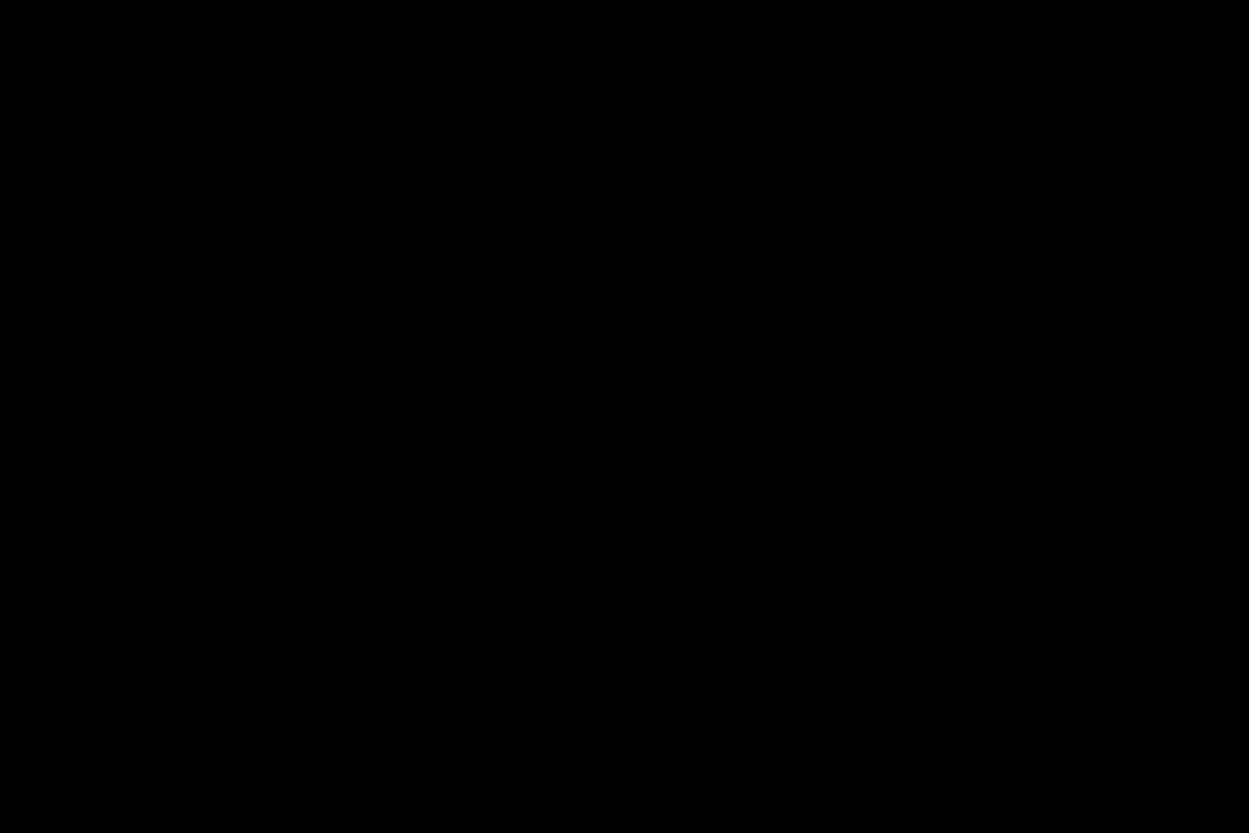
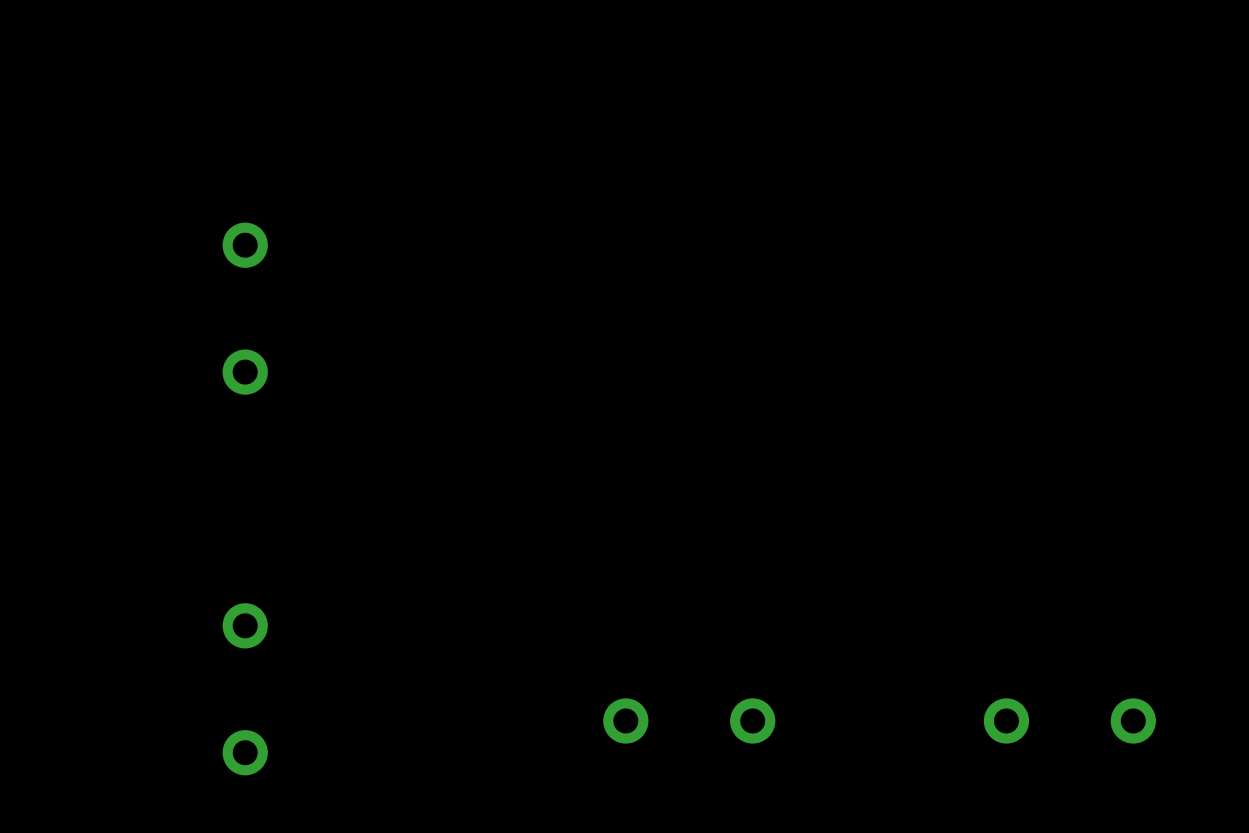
via: none -> (245, 245)
via: none -> (245, 372)
via: none -> (245, 625)
via: none -> (625, 720)
via: none -> (752, 720)
via: none -> (1006, 720)
via: none -> (1133, 720)
via: none -> (245, 752)

